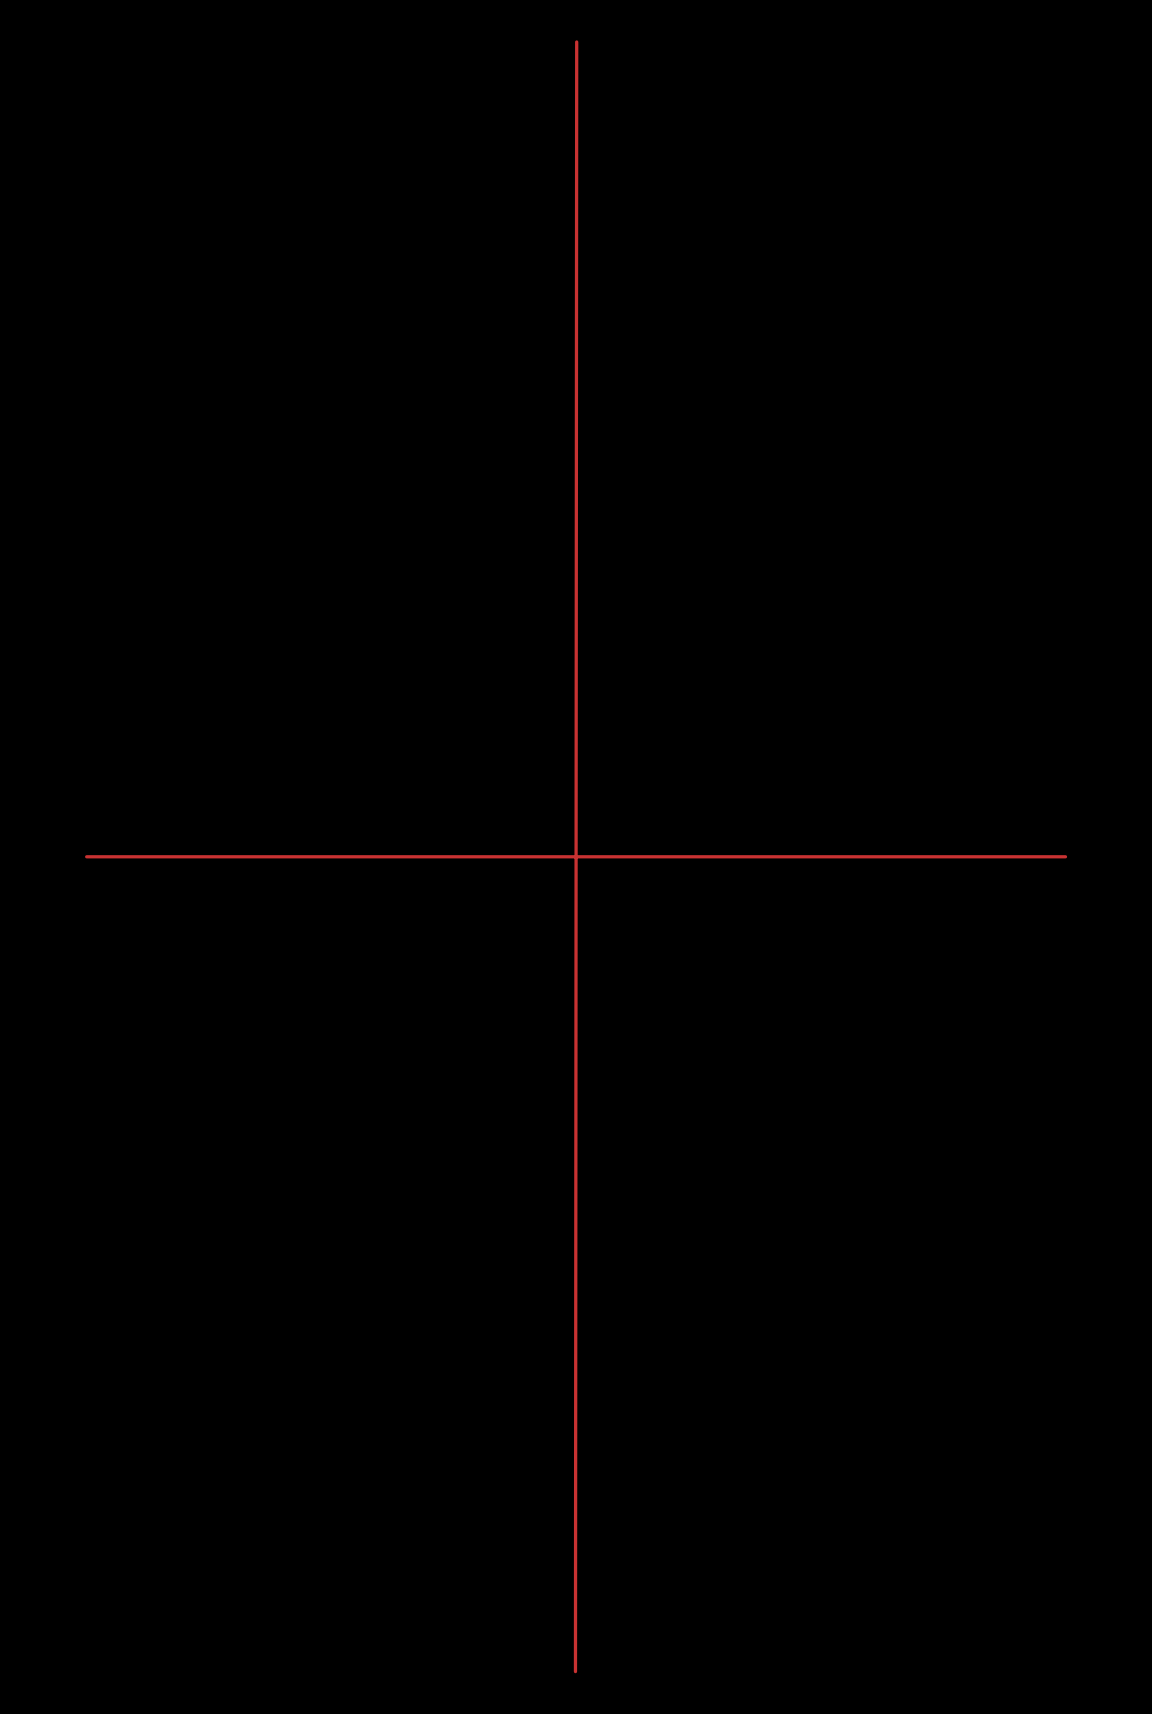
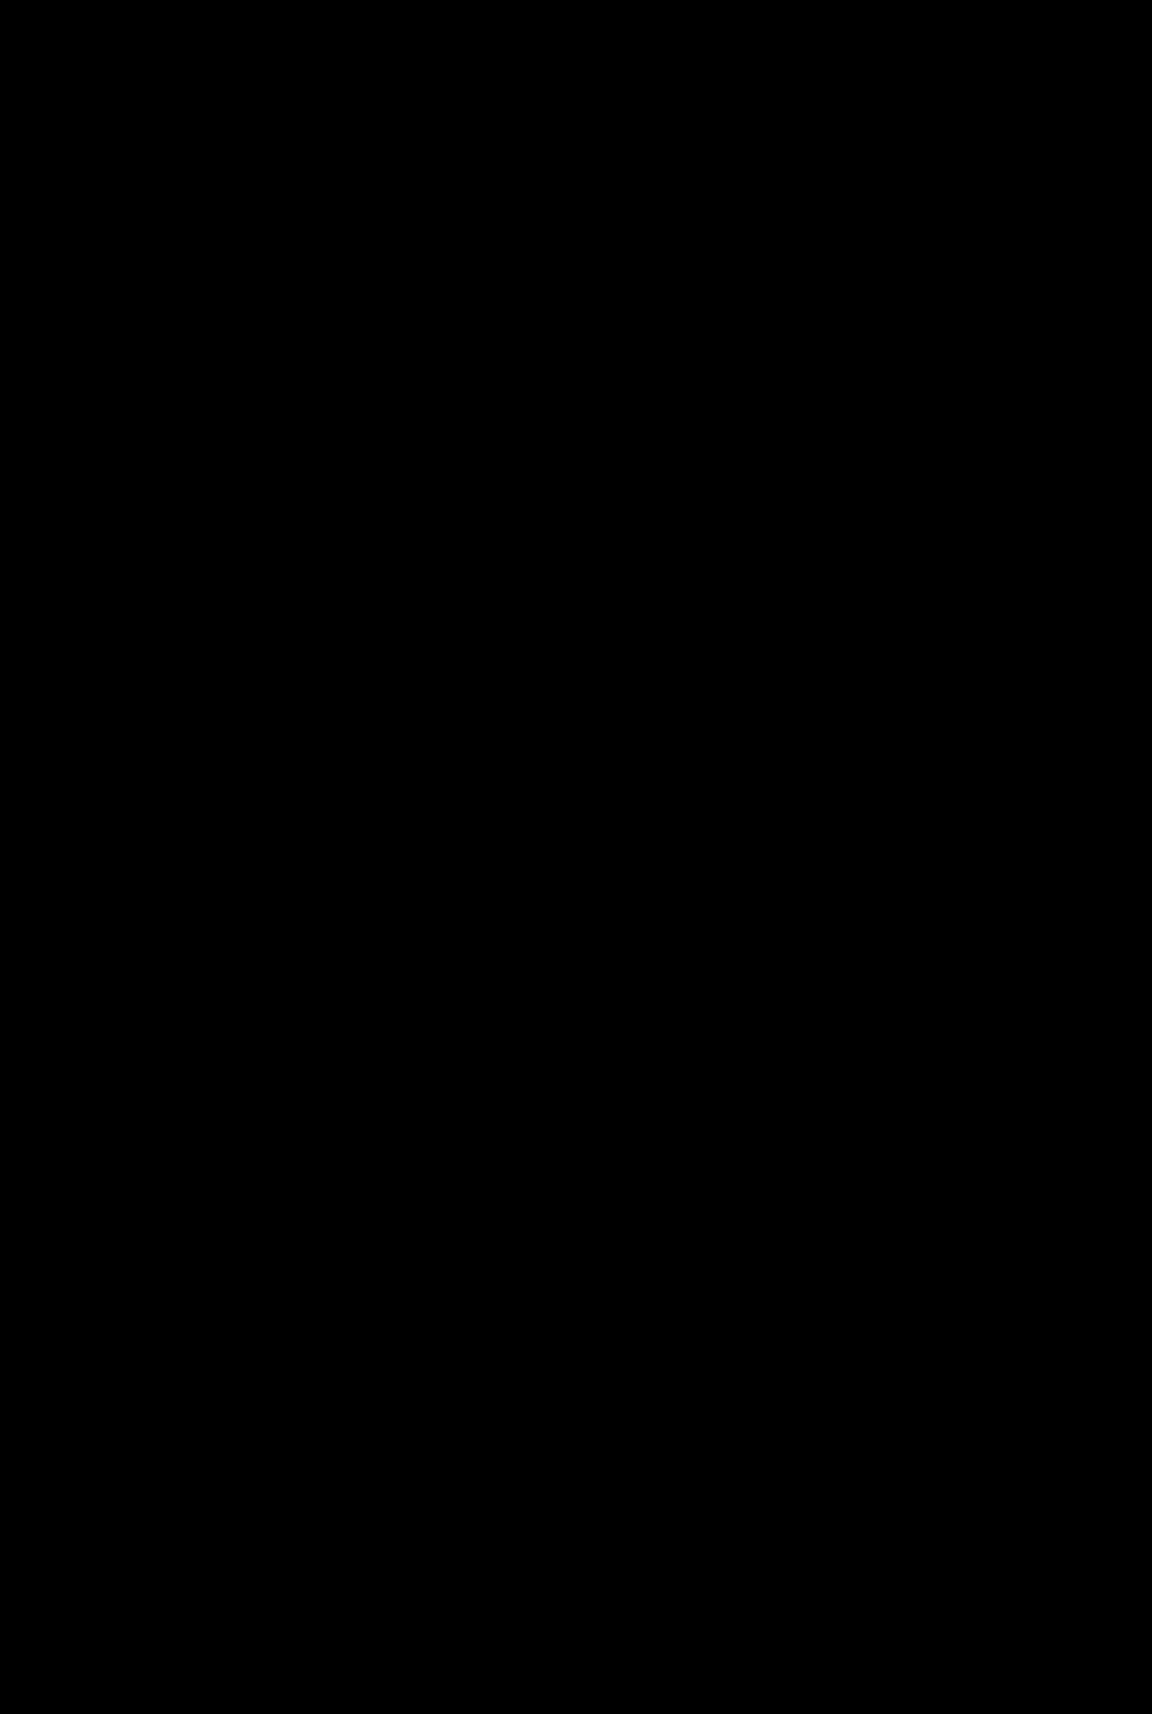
top track: (576, 41) (575, 1671) -> none
top track: (1065, 856) (86, 856) -> none

